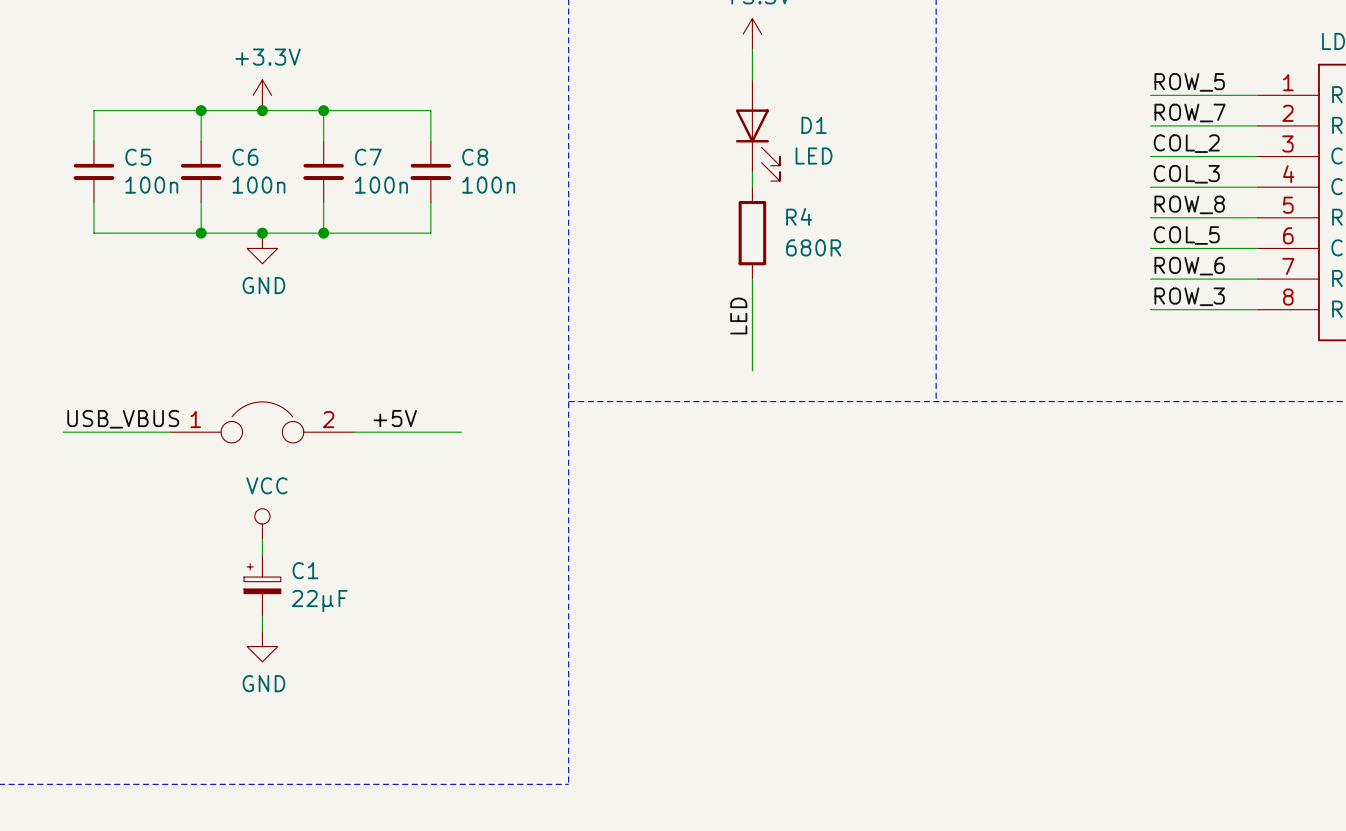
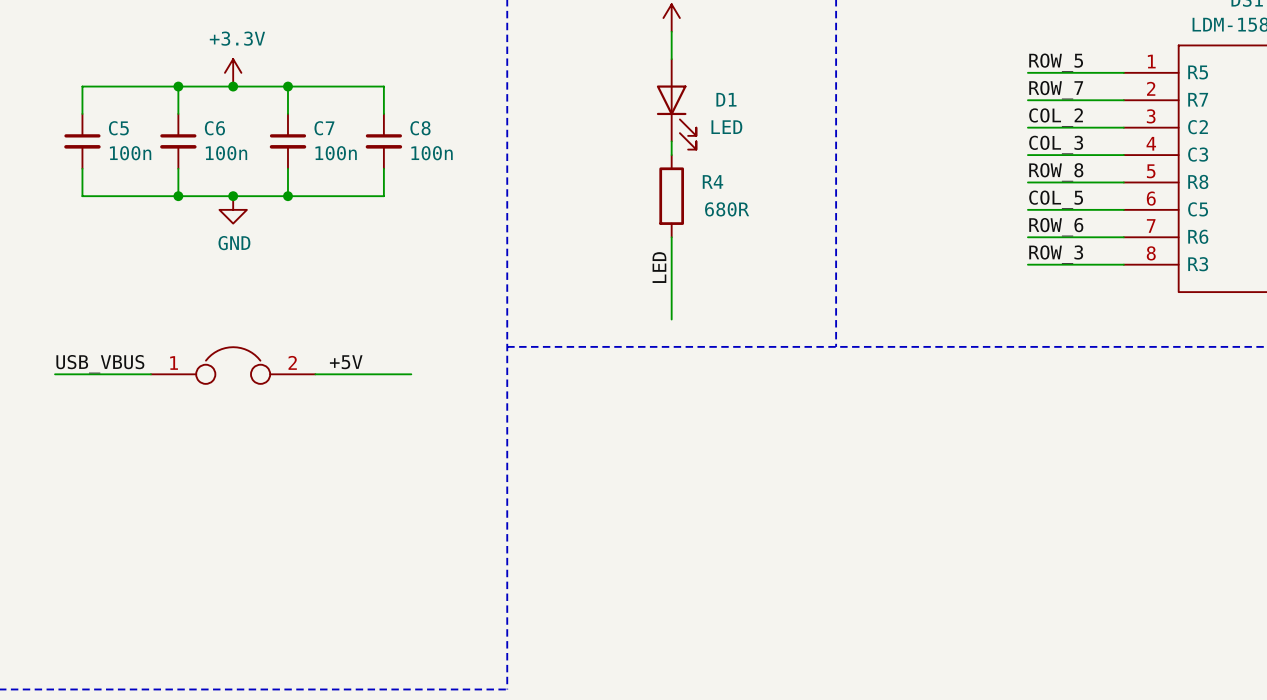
power symbol: VCC (262, 524) -> none
wire: (262, 539) (262, 554) -> none
C1: 22µF (262, 585) -> none
wire: (262, 615) (262, 631) -> none
power symbol: GND (262, 646) -> none

